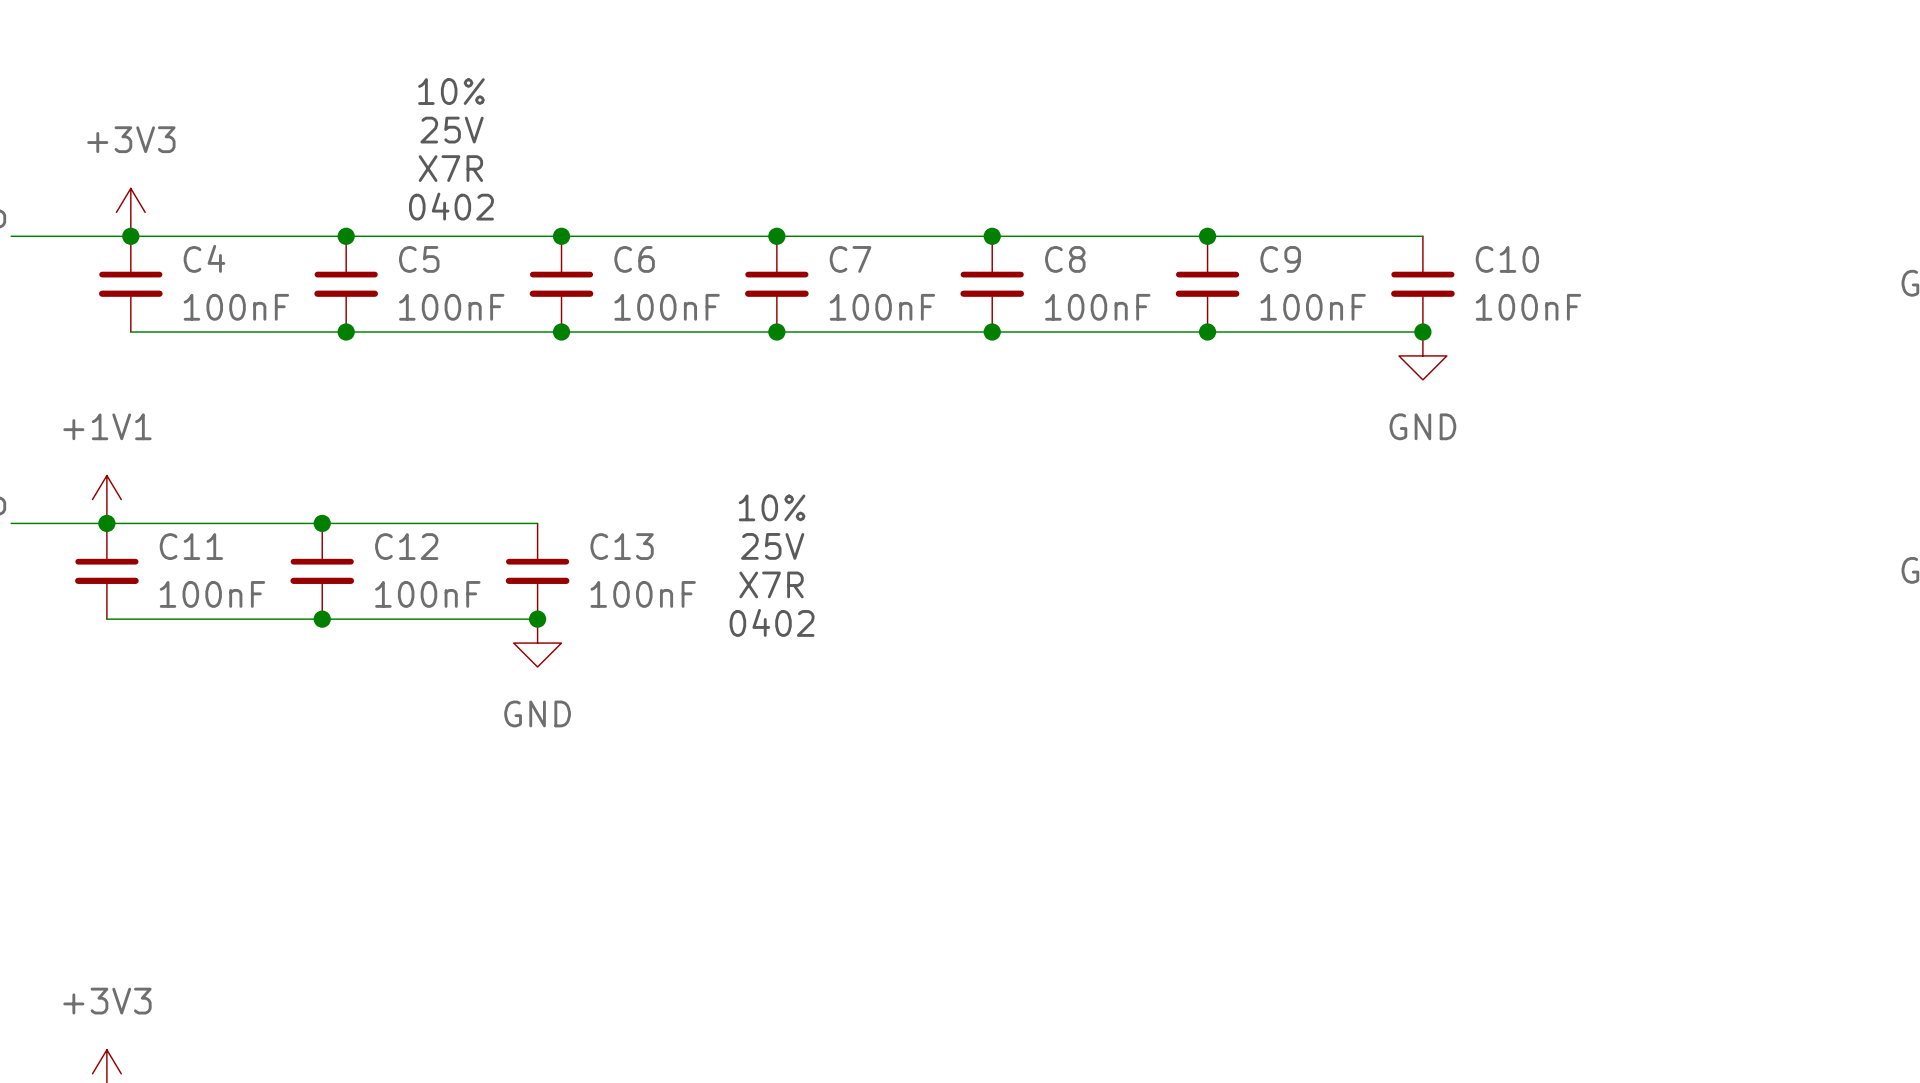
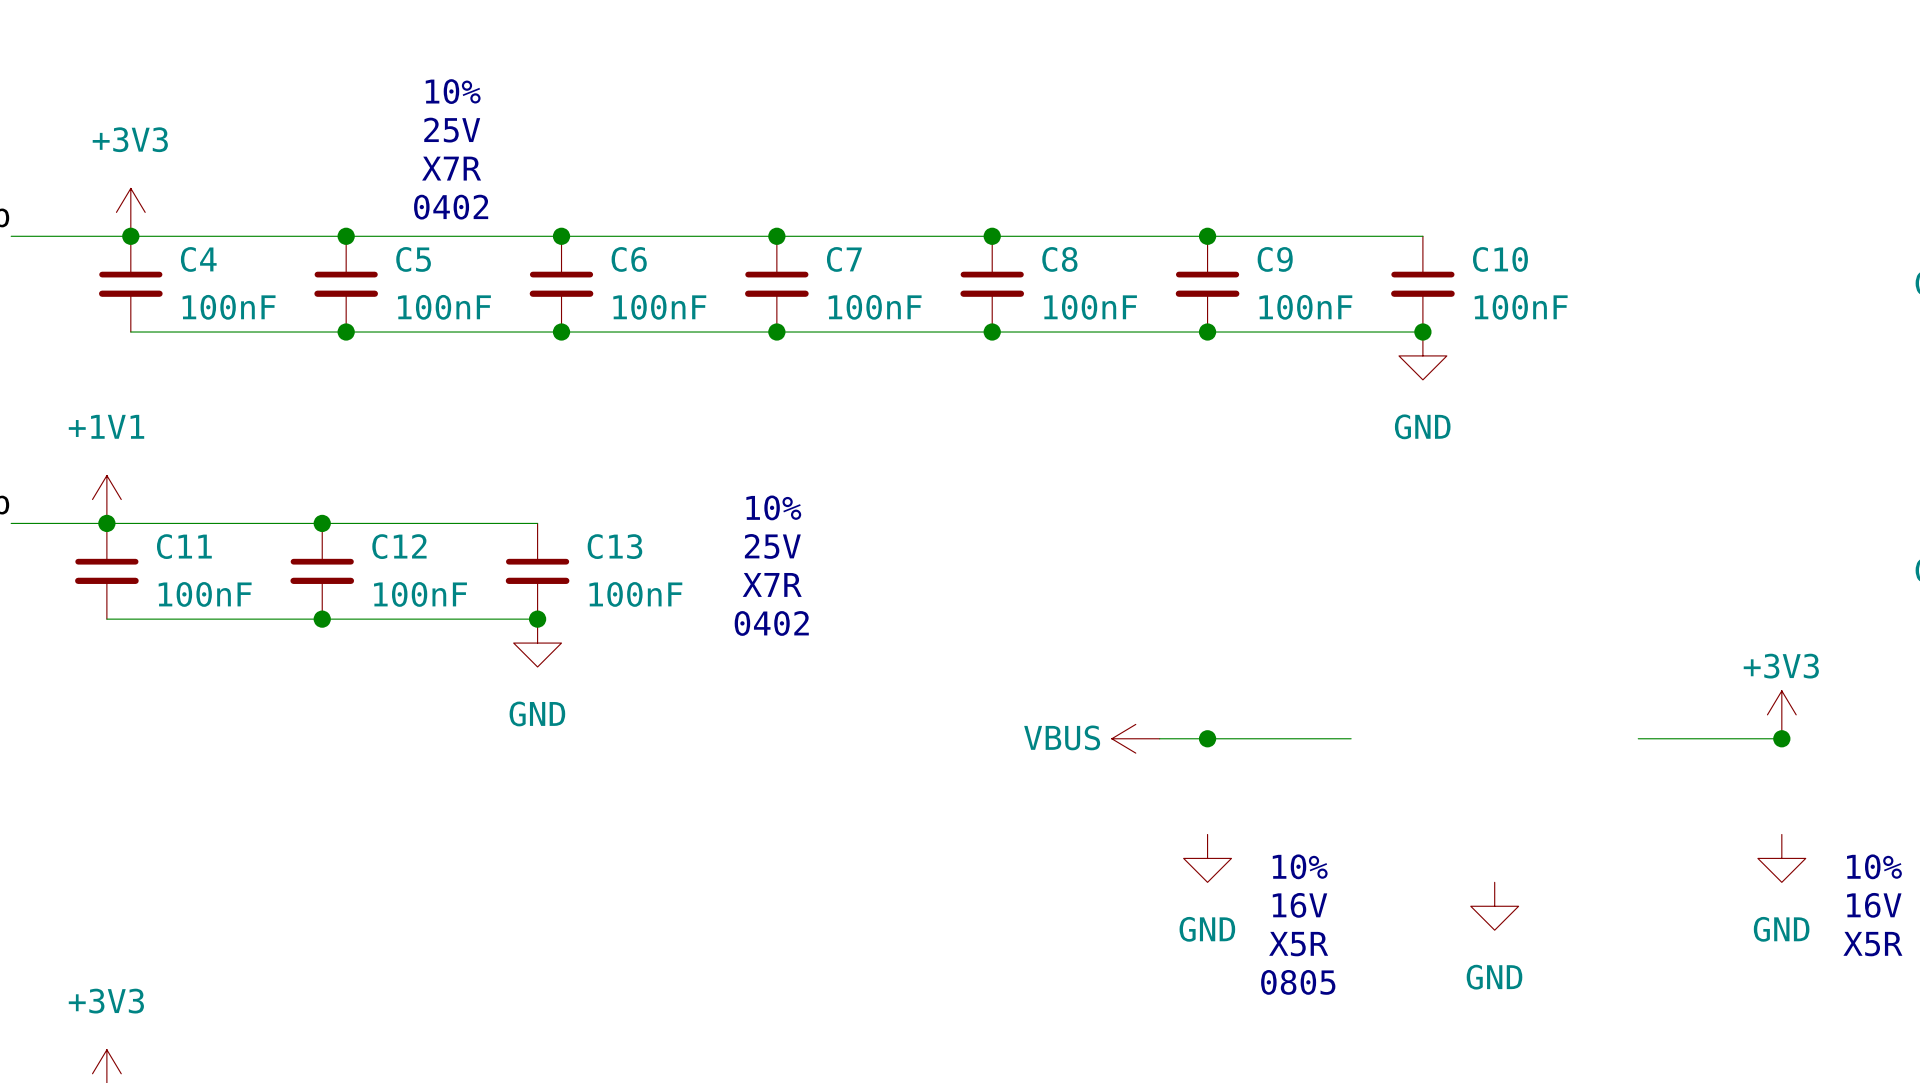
power symbol: none -> +3V3 (1781, 714)
power symbol: none -> VBUS (1135, 738)
wire: none -> (1159, 738) (1351, 738)
junction: none -> (1207, 738)
wire: none -> (1638, 738) (1781, 738)
junction: none -> (1781, 738)
power symbol: none -> GND (1207, 858)
power symbol: none -> GND (1781, 858)
text: none -> 10% (1300, 866)
text: none -> 10% (1874, 866)
text: none -> 16V (1300, 905)
text: none -> 16V (1874, 905)
power symbol: none -> GND (1494, 906)
text: none -> X5R (1298, 944)
text: none -> X5R (1872, 944)
text: none -> 0805 (1298, 982)

